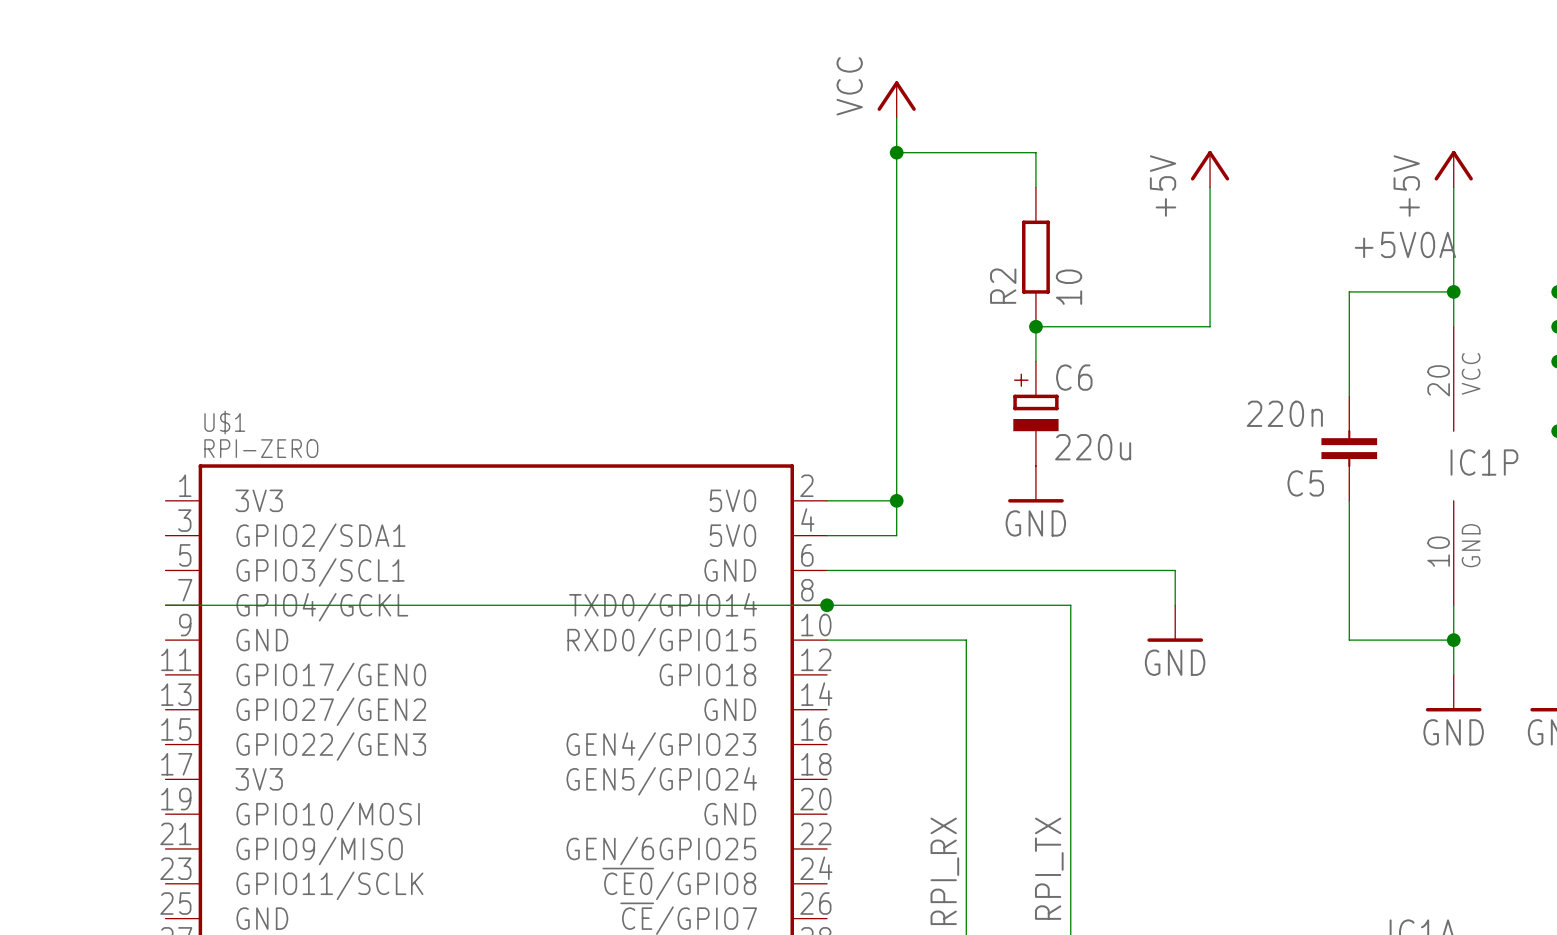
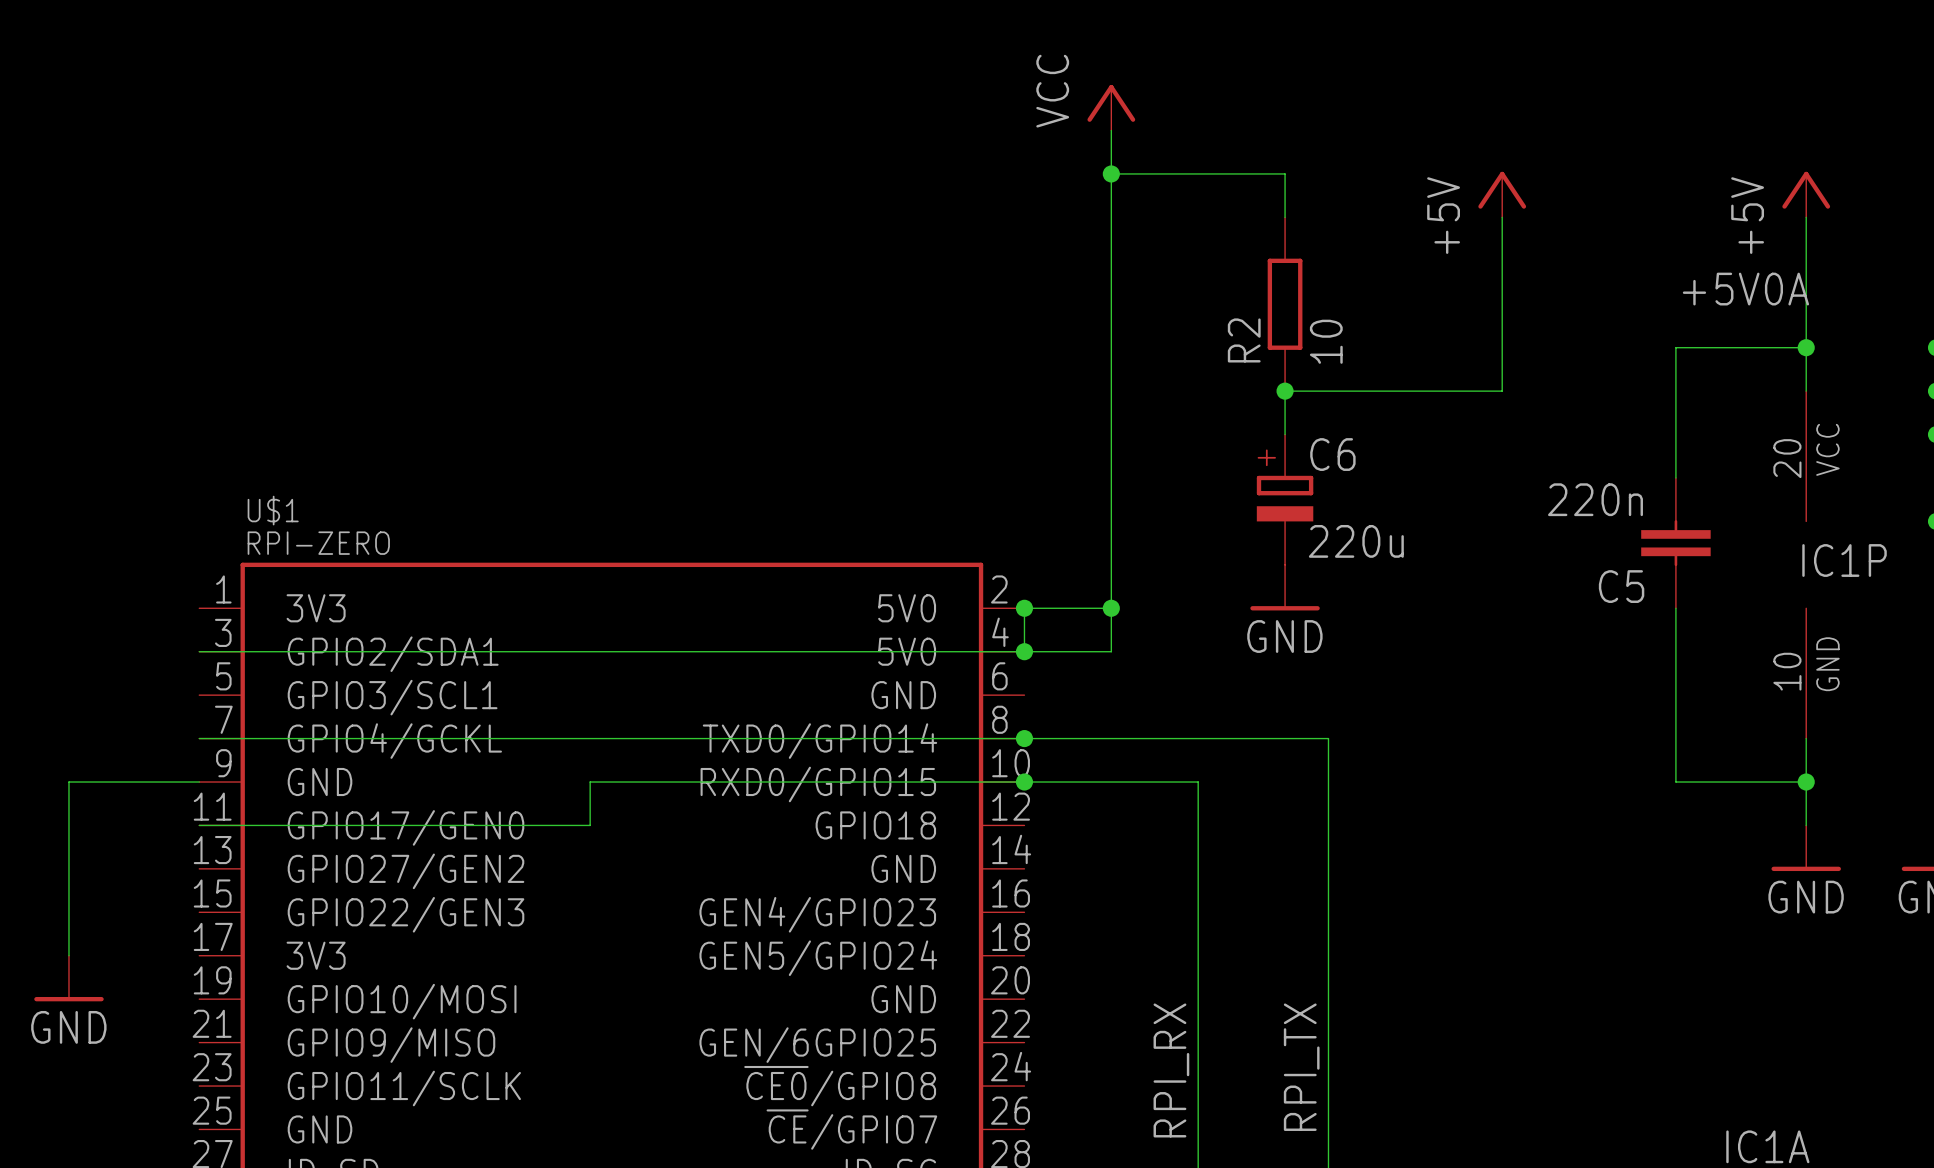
wire: none -> (1024, 608) (1024, 651) (199, 651)
junction: none -> (1024, 608)
junction: none -> (1024, 651)
wire: (827, 570) (1175, 570) (1175, 605) -> none
power symbol: GND (1175, 623) -> none
wire: none -> (199, 782) (68, 782) (68, 955)
wire: none -> (1024, 782) (590, 782) (590, 825) (199, 825)
junction: none -> (1024, 782)
power symbol: none -> GND (68, 978)

